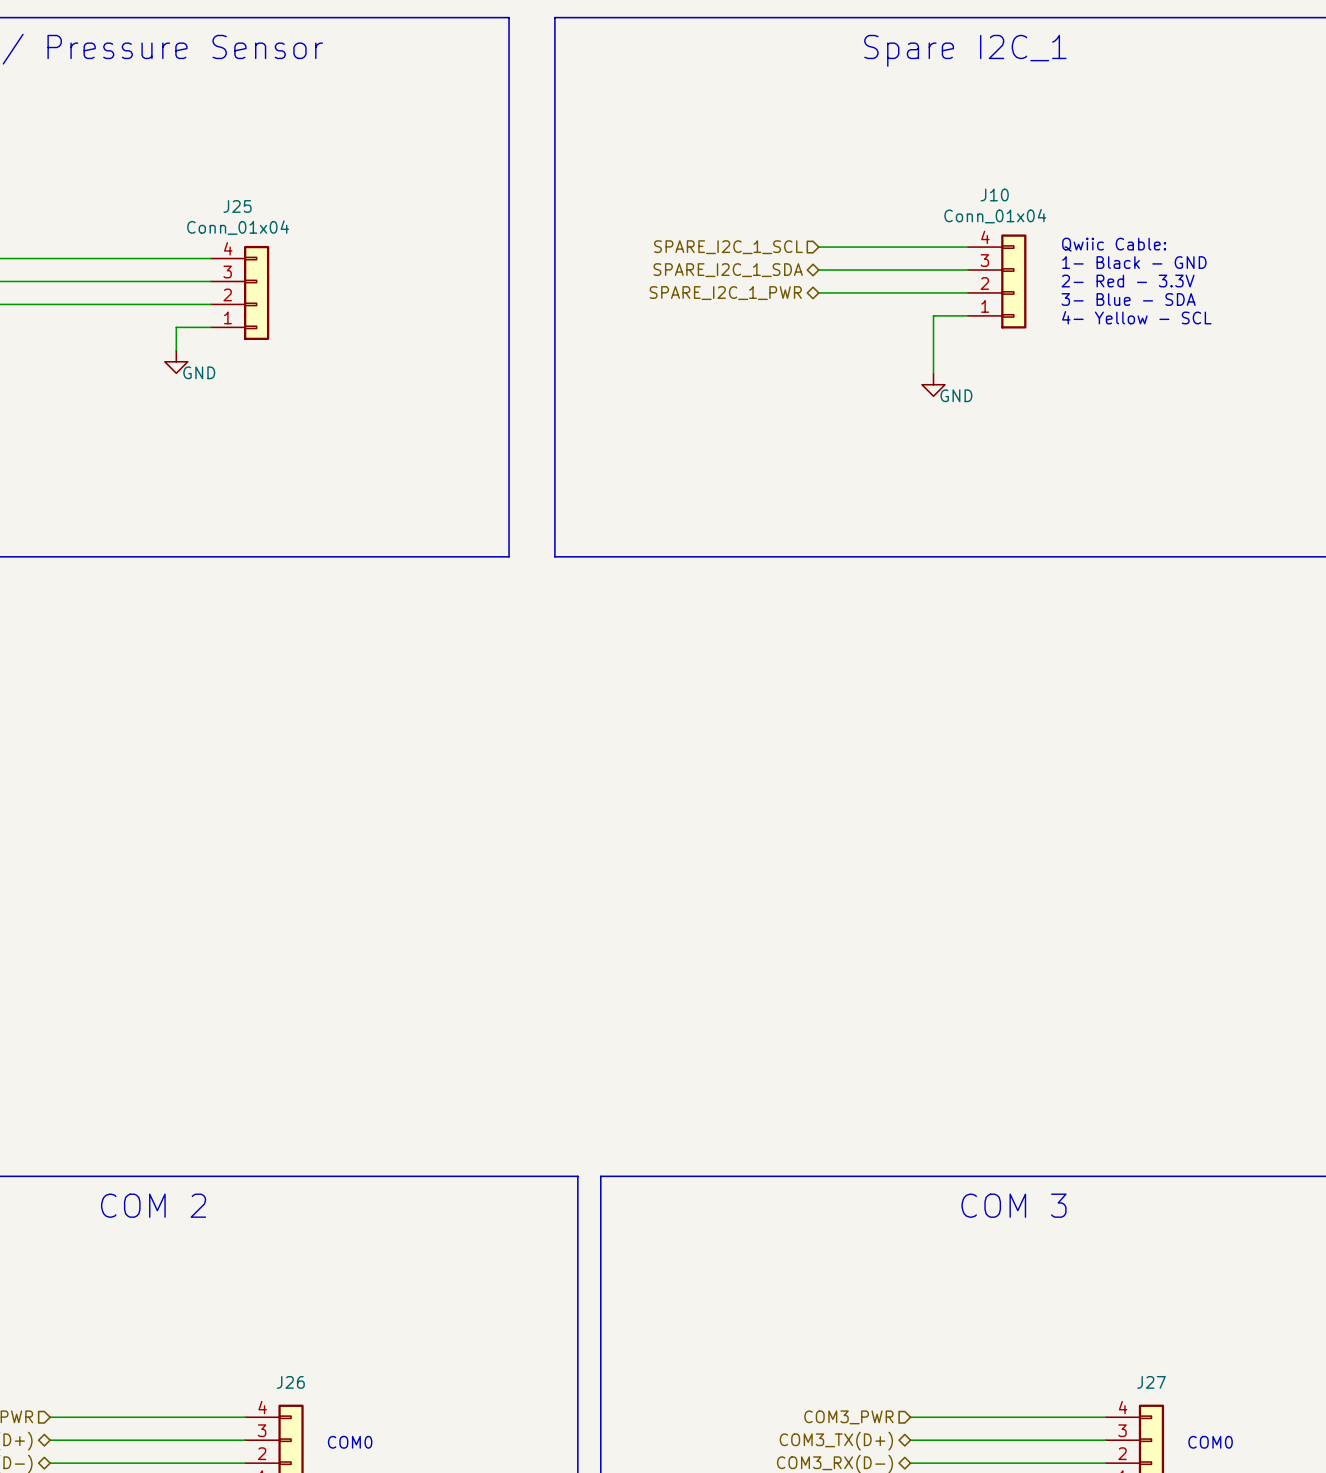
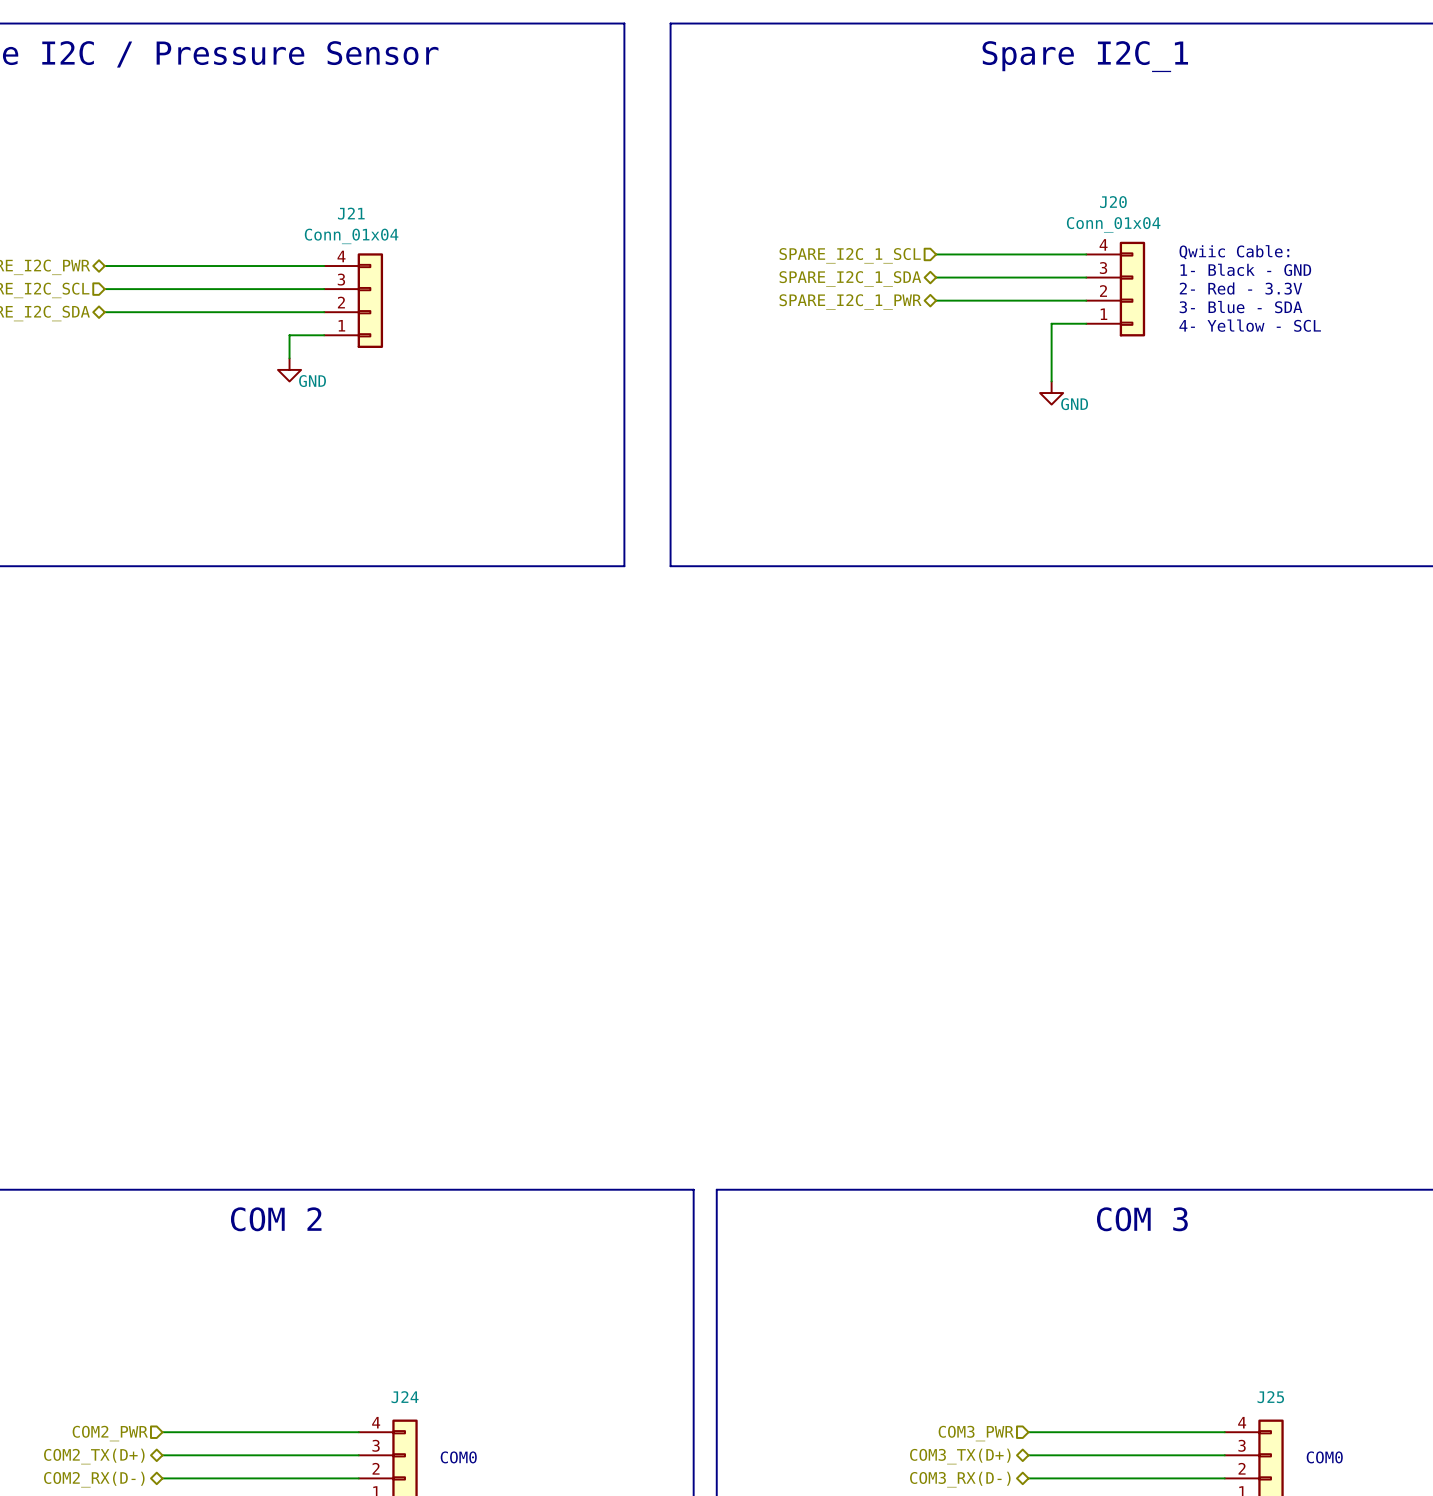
J10 name: J10 (994, 195) -> J20 (1113, 202)
J25 name: J25 (237, 206) -> J21 (351, 213)
J26 name: J26 (290, 1382) -> J24 (405, 1397)
J27 name: J27 (1151, 1382) -> J25 (1270, 1397)

